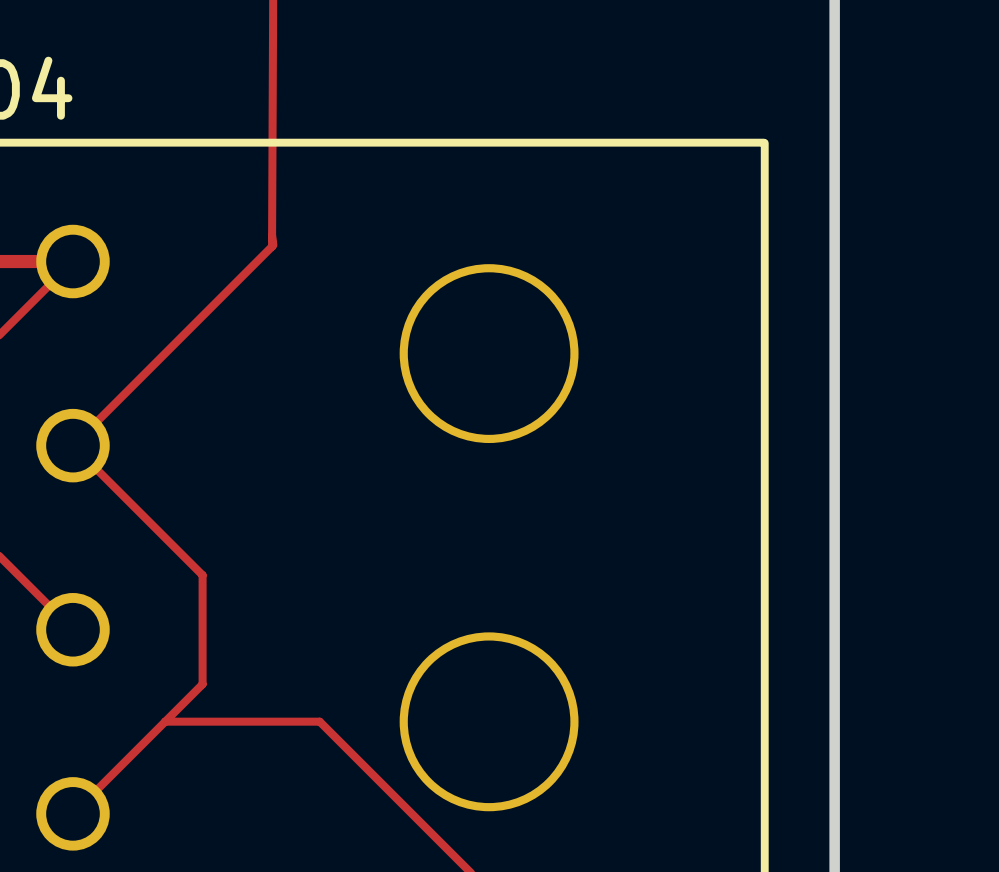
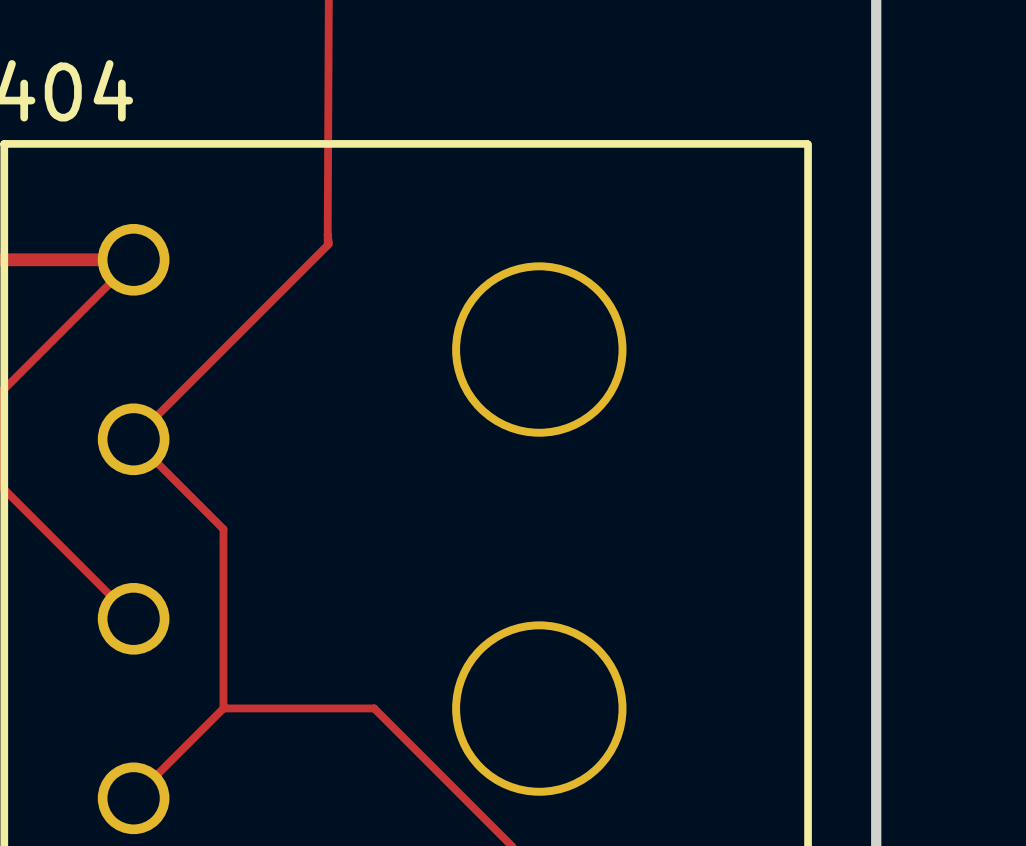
track: (165, 537) (202, 575) (202, 684) (165, 721) -> (223, 529) (223, 708)

